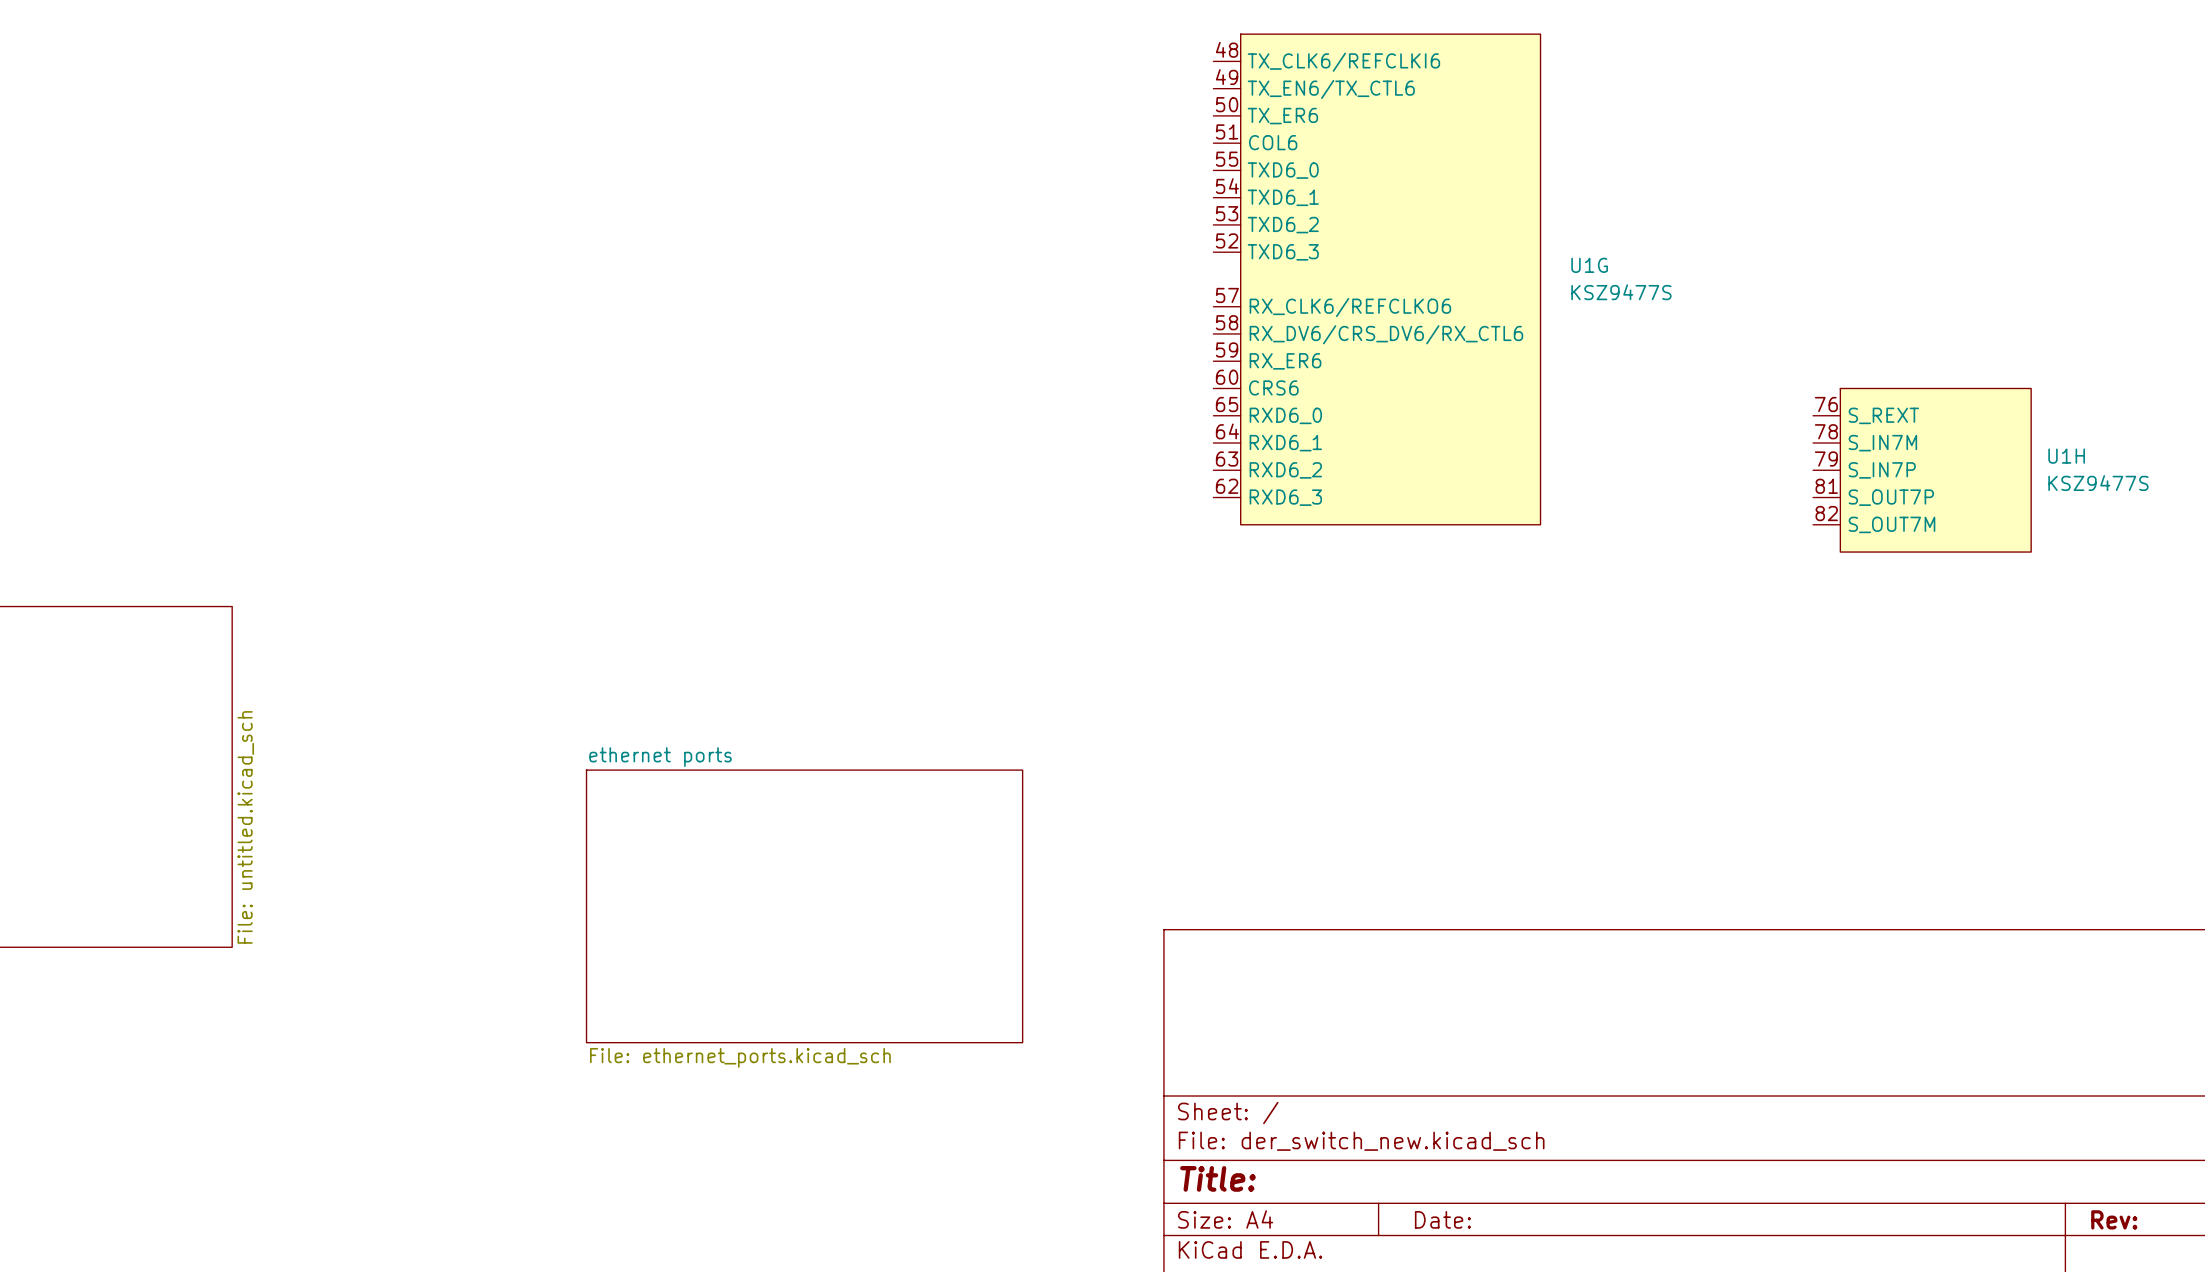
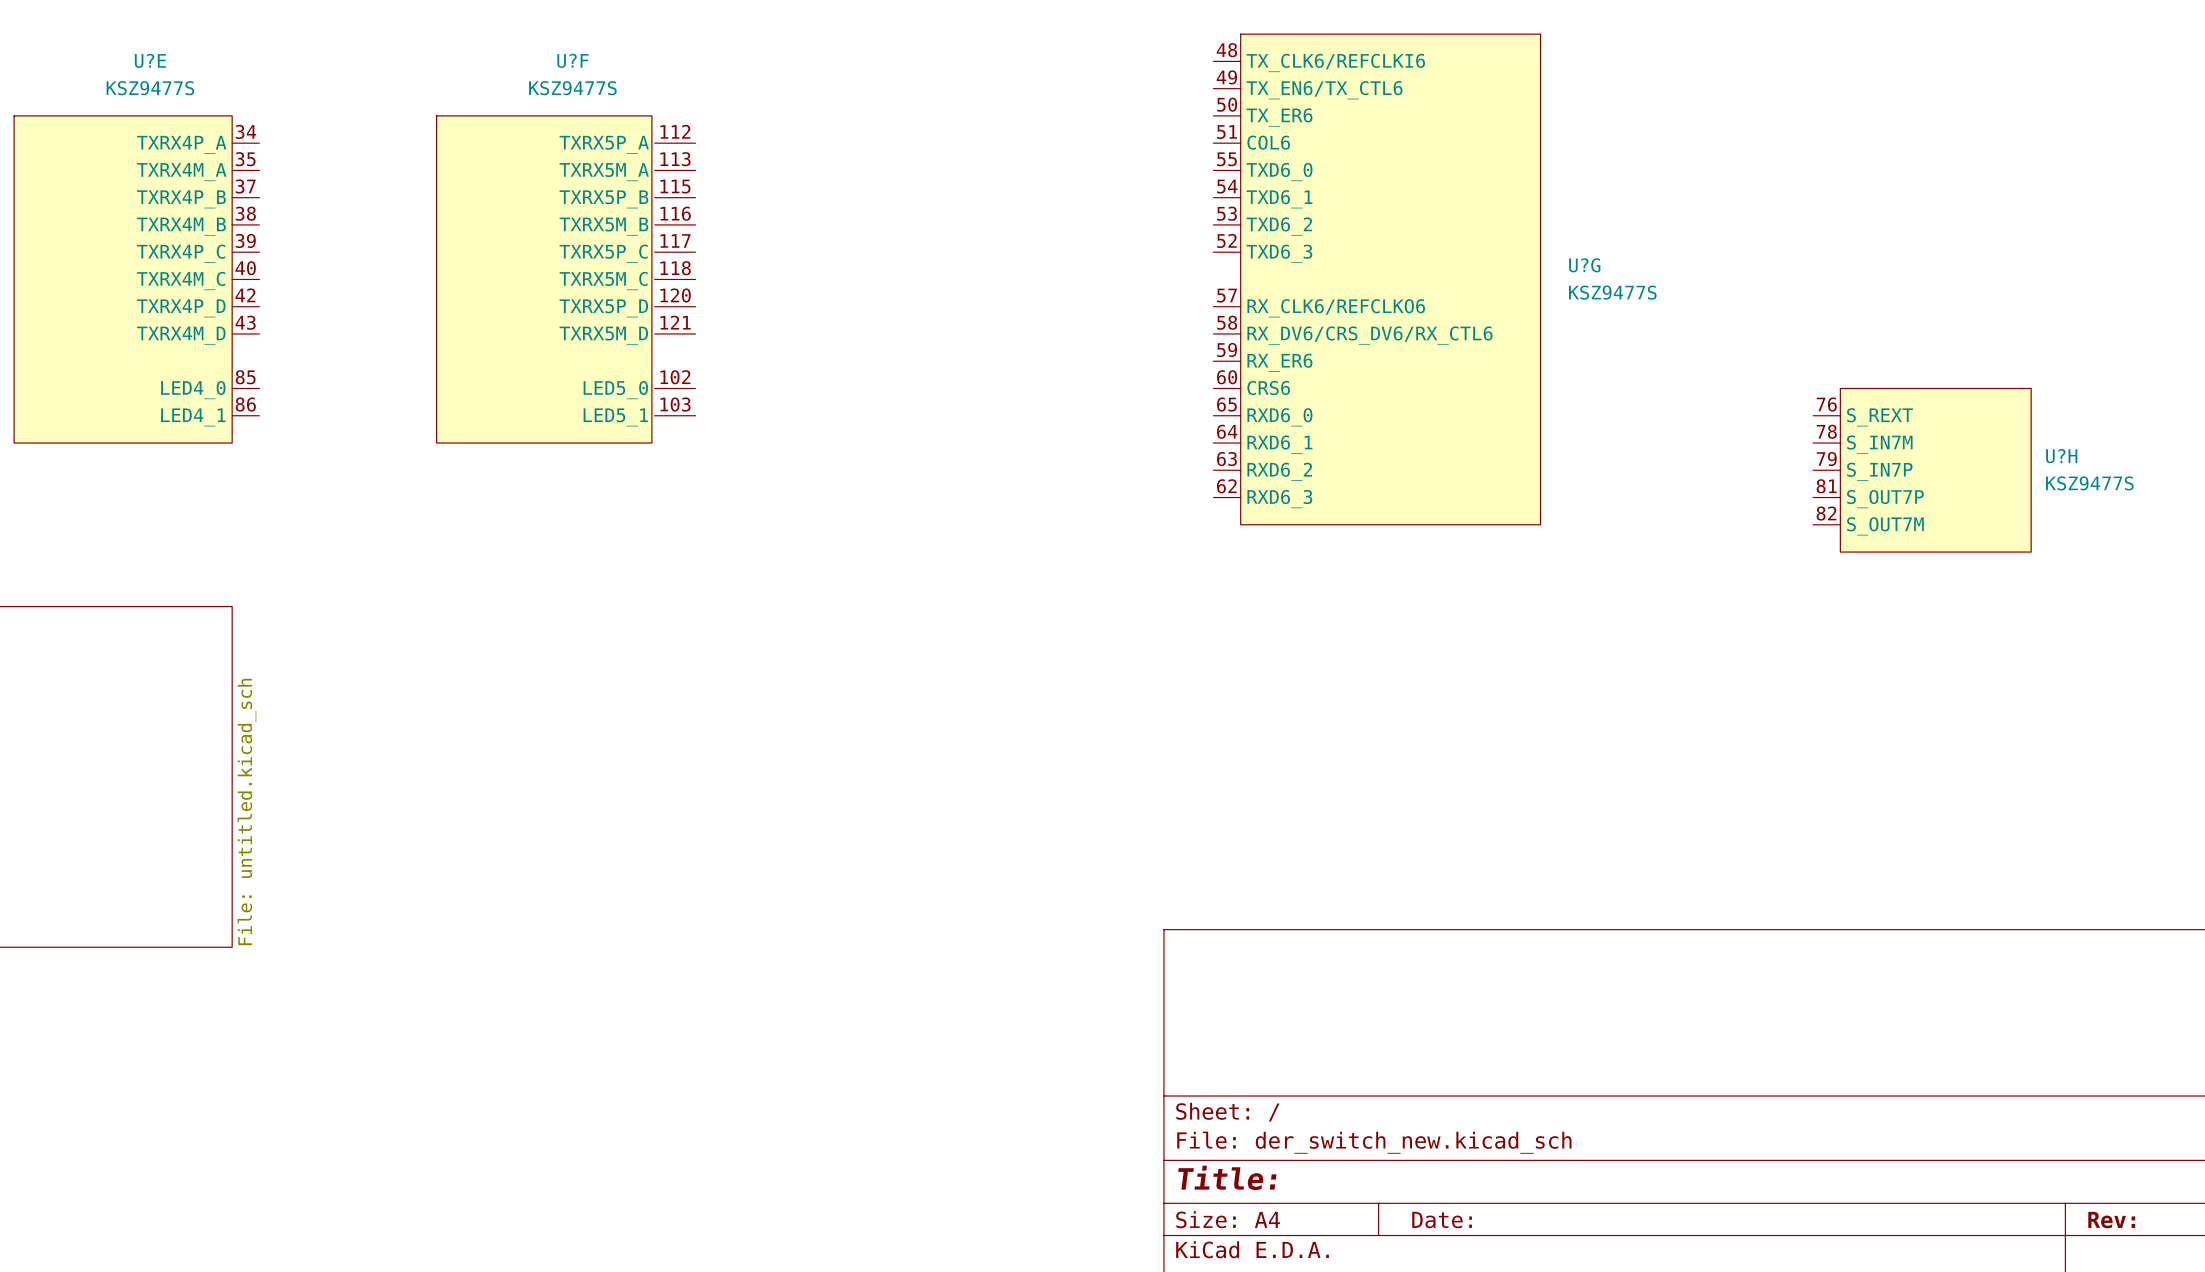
U1G name: U1G (1589, 265) -> U?G (1584, 265)
U?E: none -> KSZ9477S (136, 279)
U?F: none -> KSZ9477S (566, 279)
U1H name: U1H (2066, 456) -> U?H (2061, 456)
sheet ethernet ports: File: ethernet_ports.kicad_sch (804, 906) -> none

